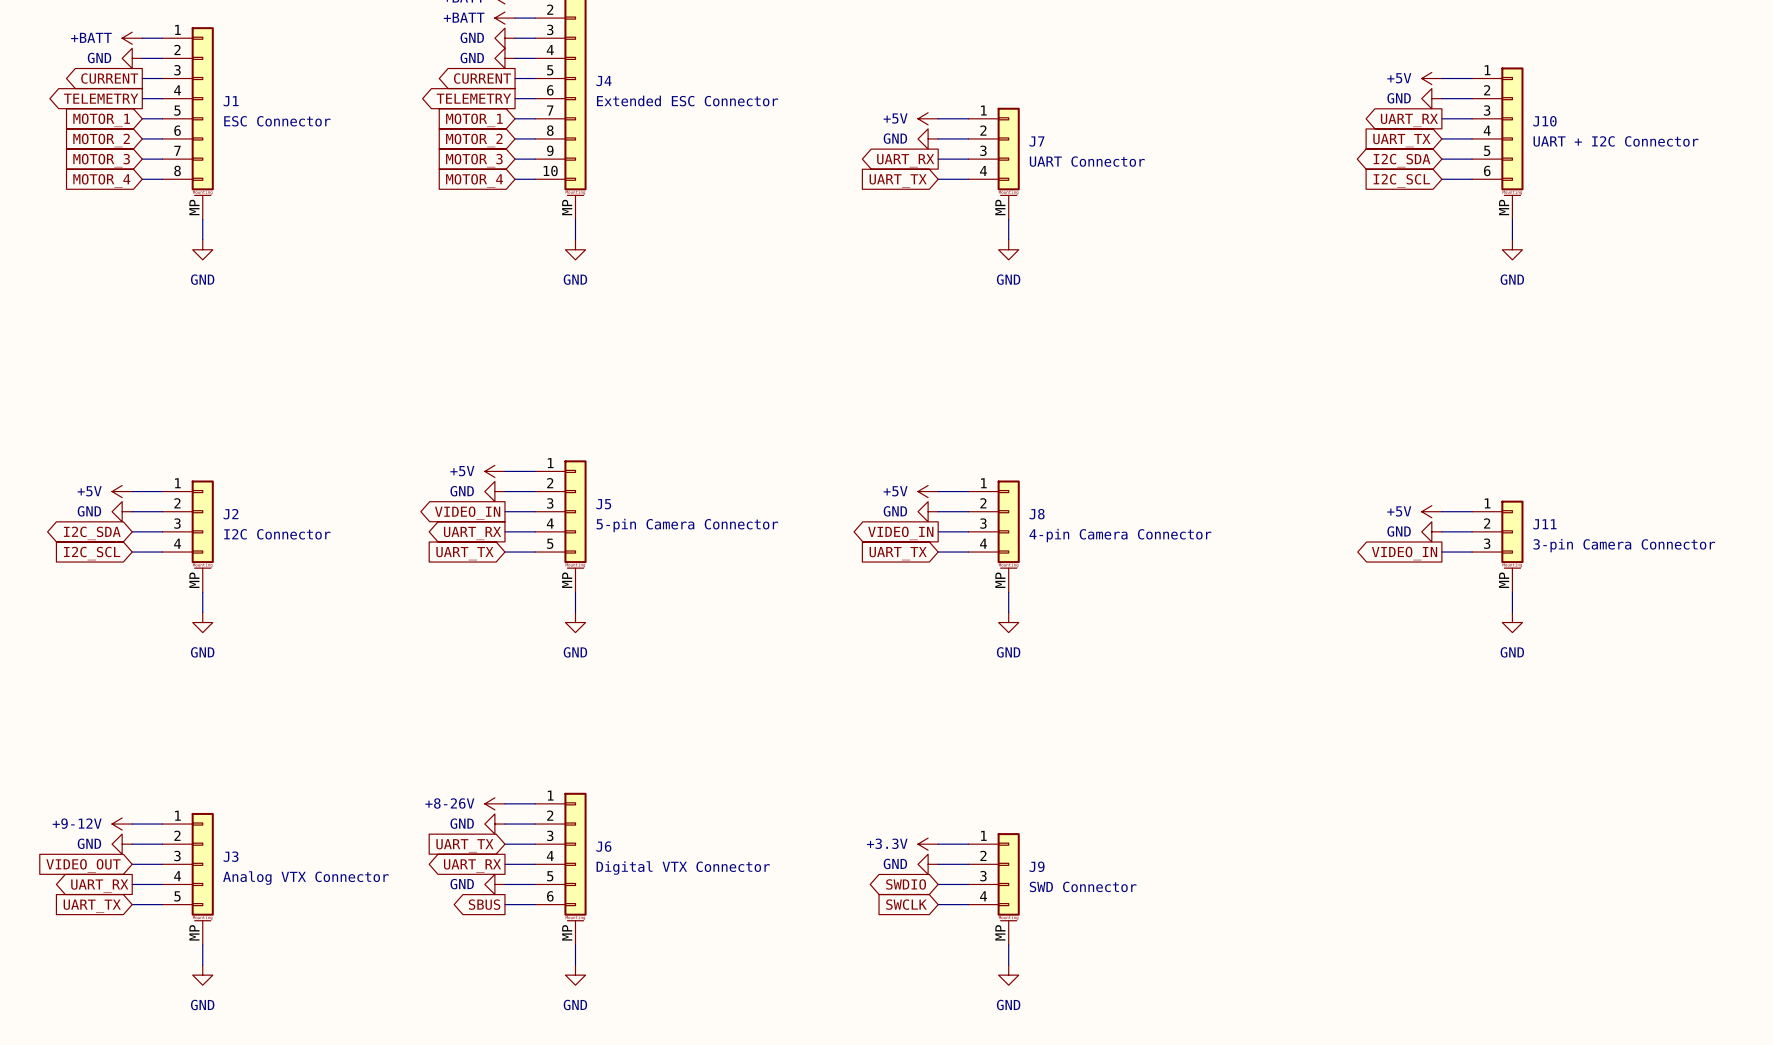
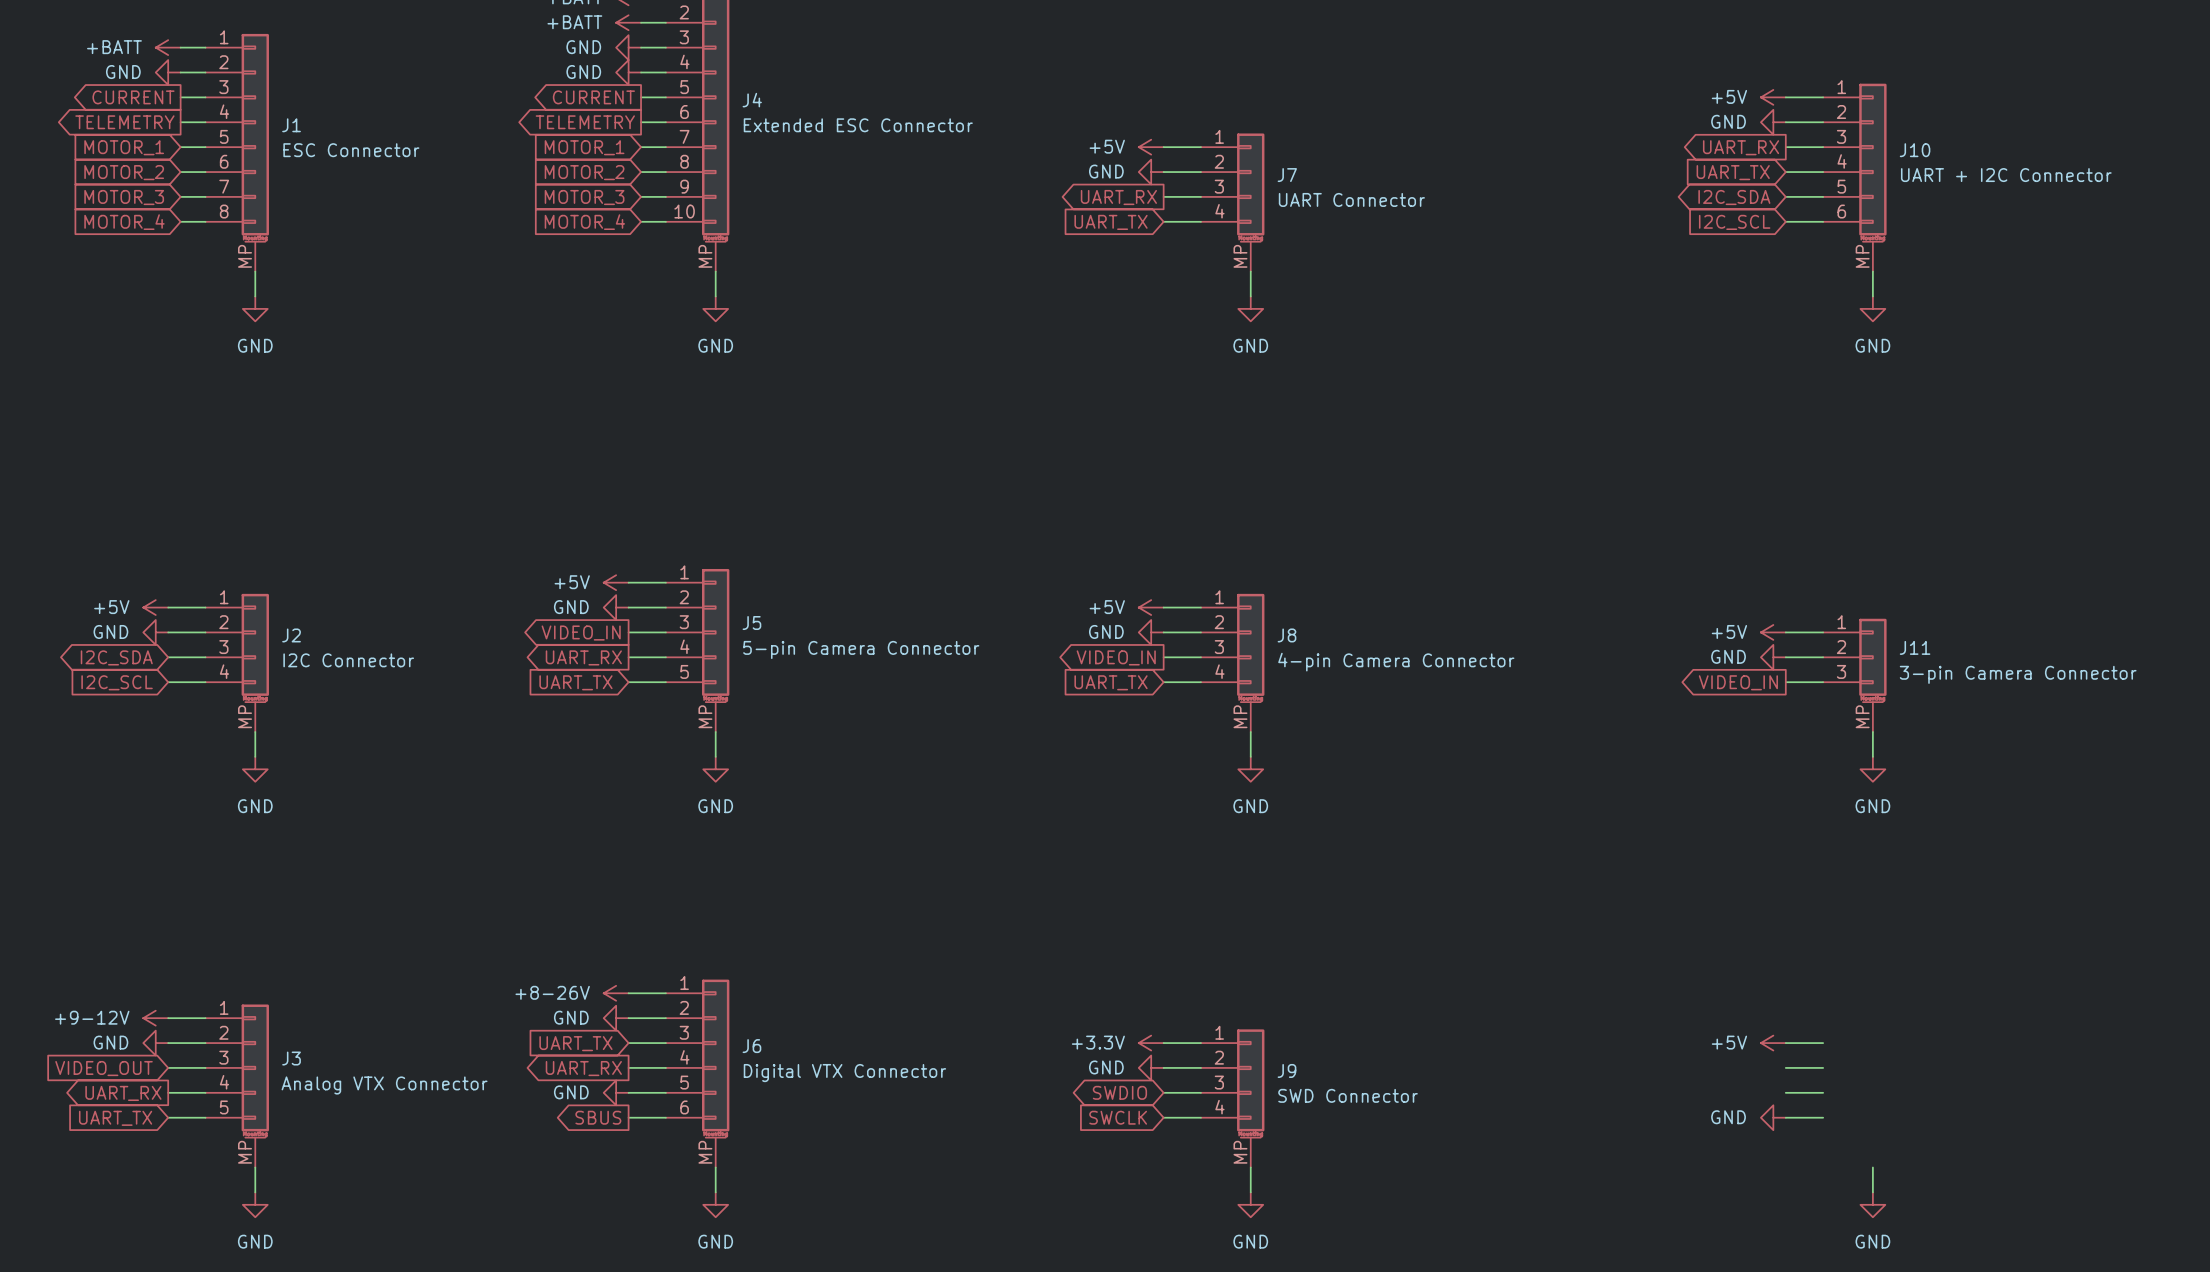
power symbol: none -> +5V (1773, 1043)
wire: none -> (1785, 1043) (1823, 1043)
wire: none -> (1785, 1067) (1823, 1067)
wire: none -> (1785, 1092) (1823, 1092)
power symbol: none -> GND (1773, 1117)
wire: none -> (1785, 1117) (1823, 1117)
wire: none -> (1872, 1167) (1872, 1192)
power symbol: none -> GND (1872, 1204)

